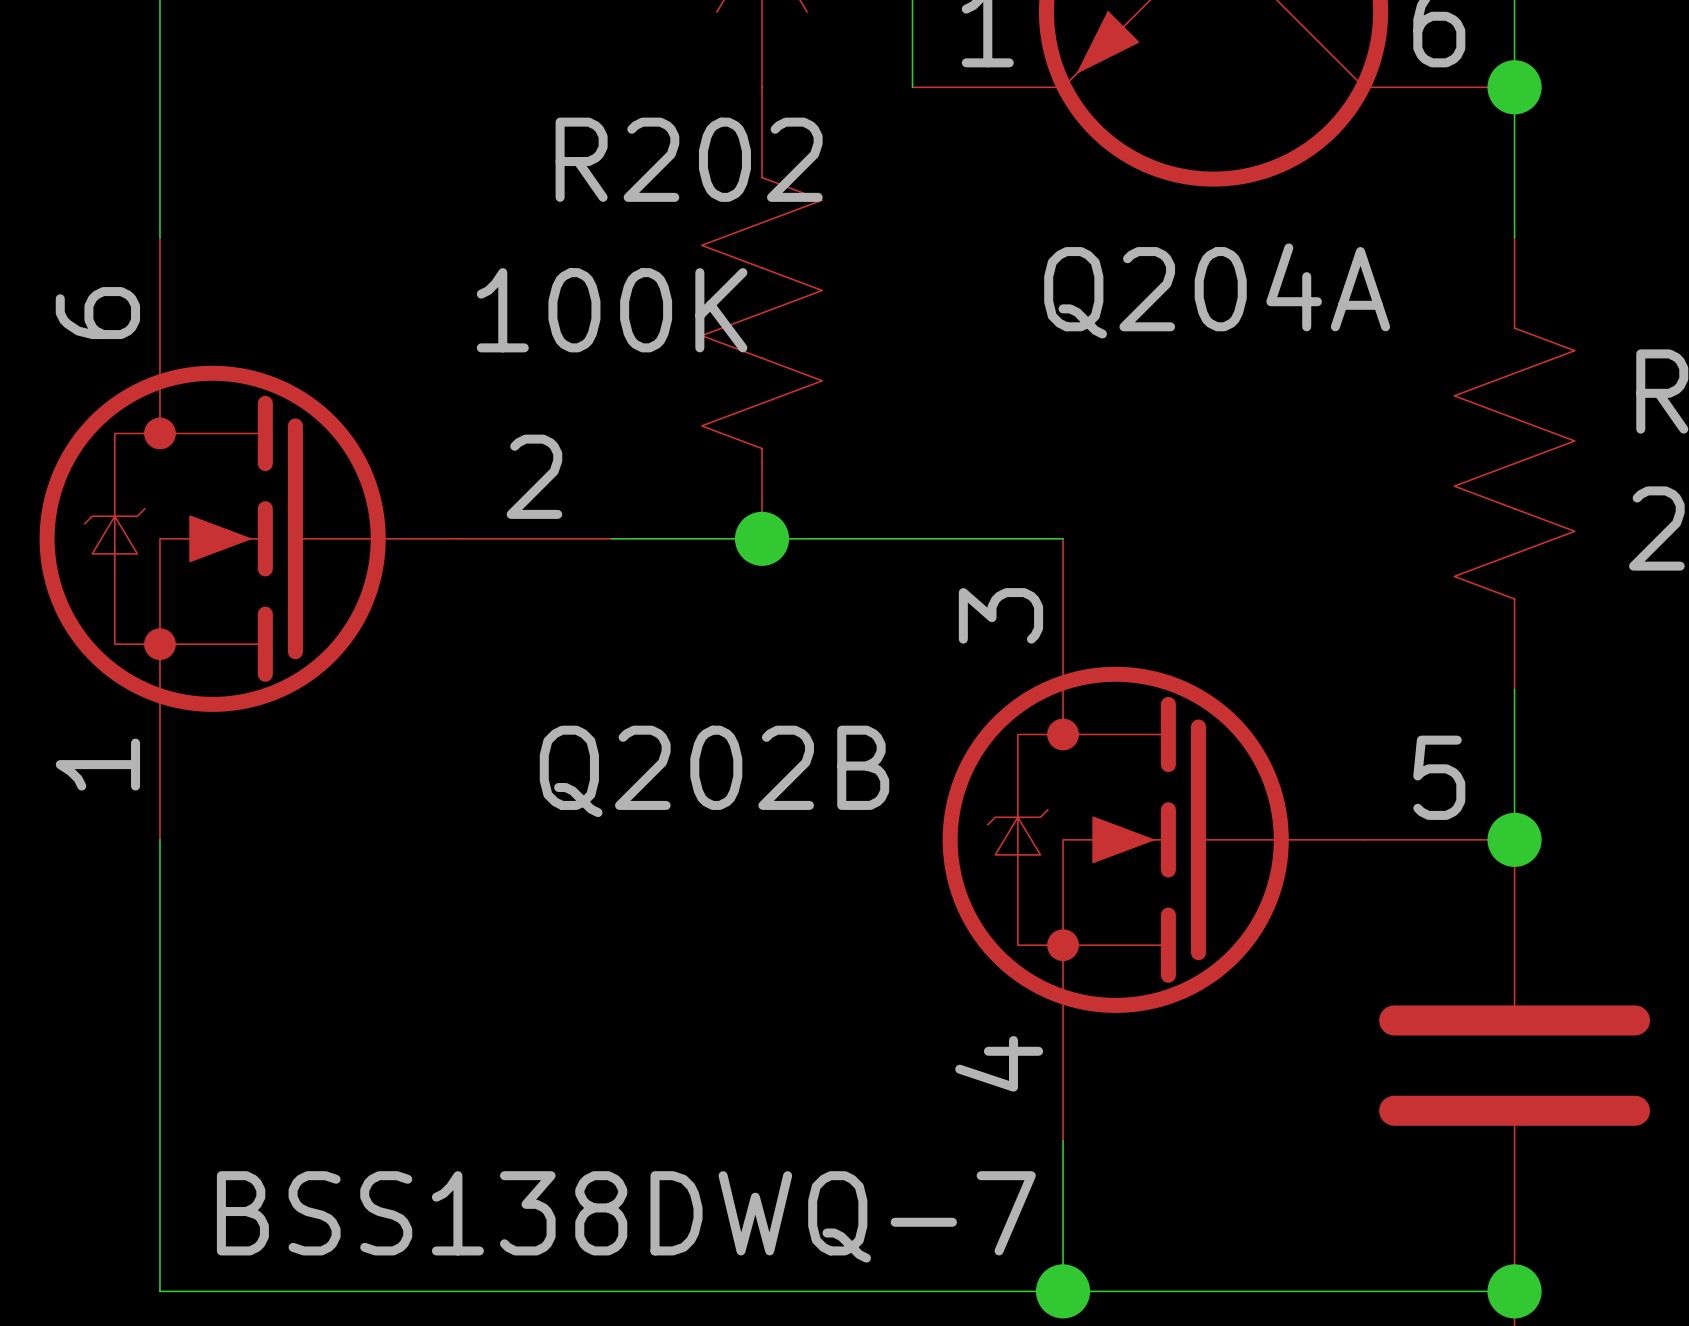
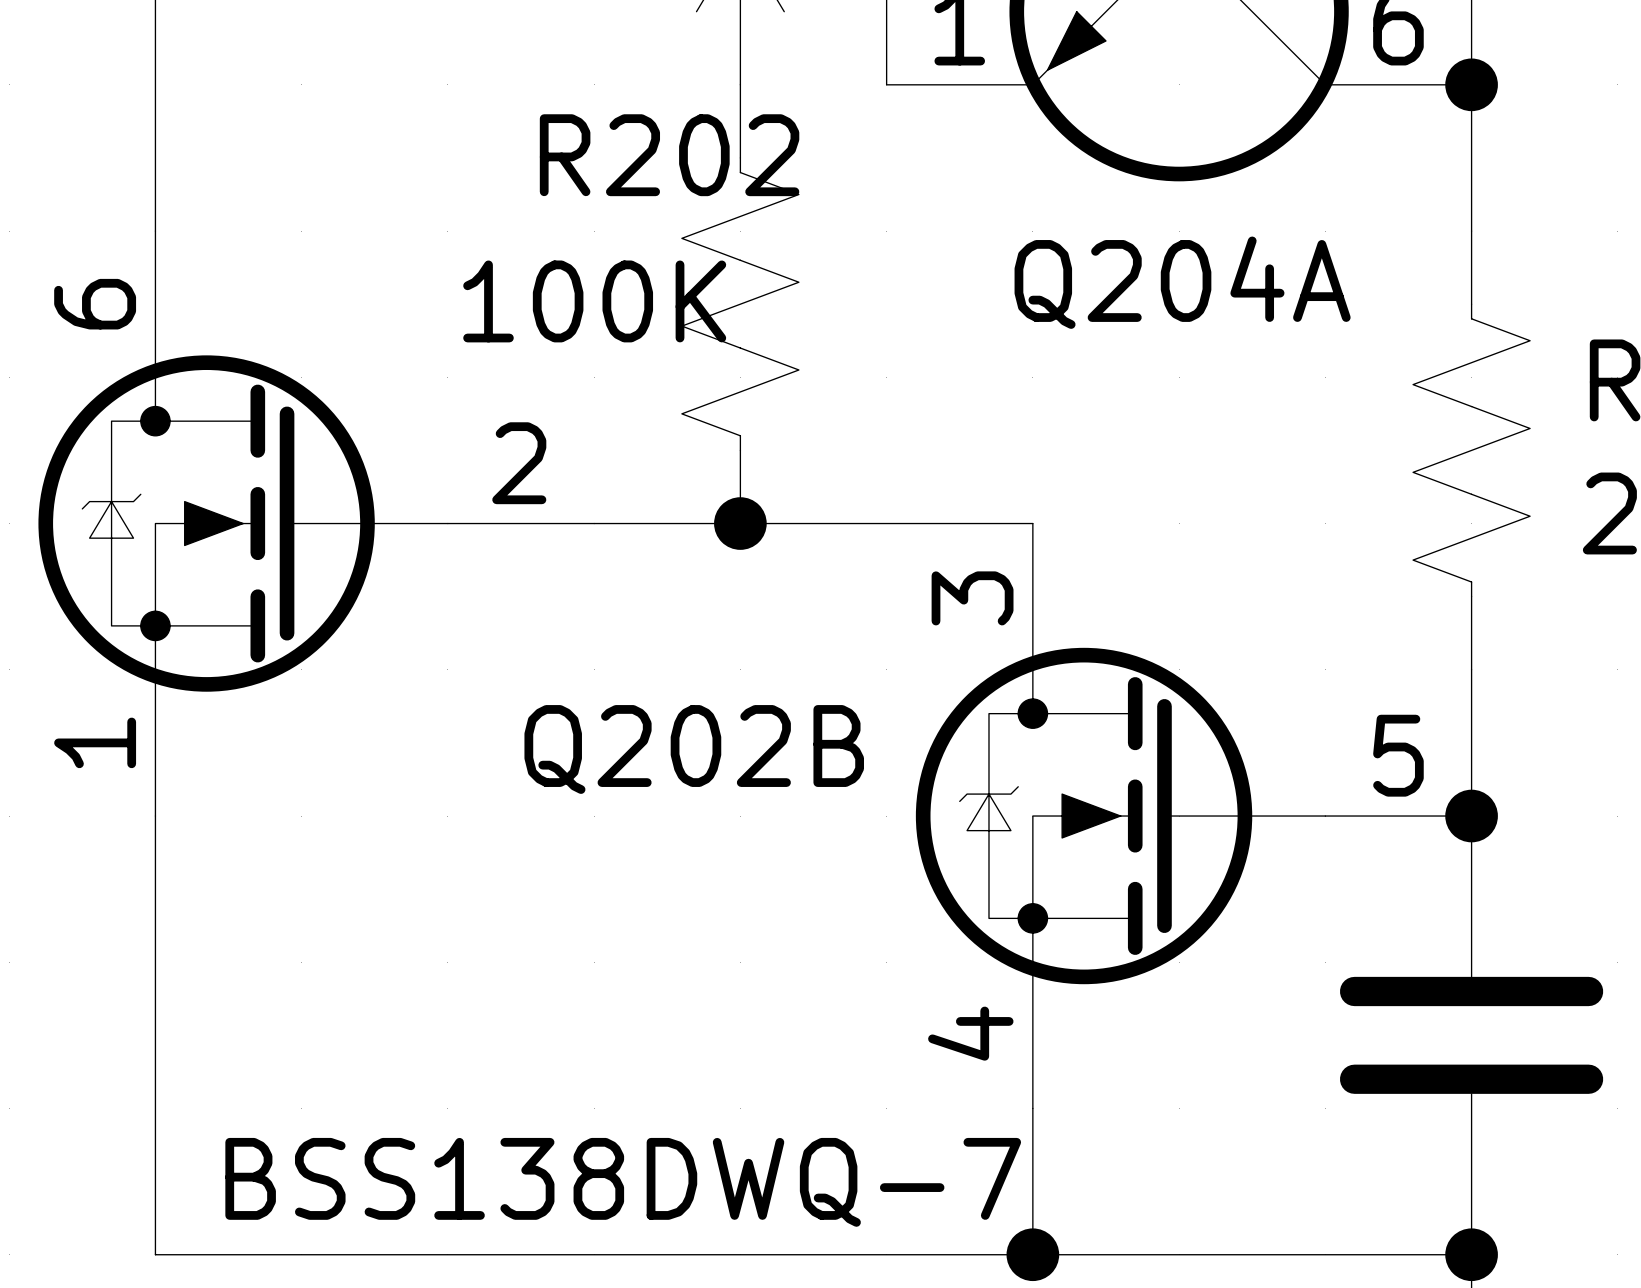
part value position: BSS138DWQ-7 (626, 1216) -> BSS138DWQ-7 (623, 1182)

